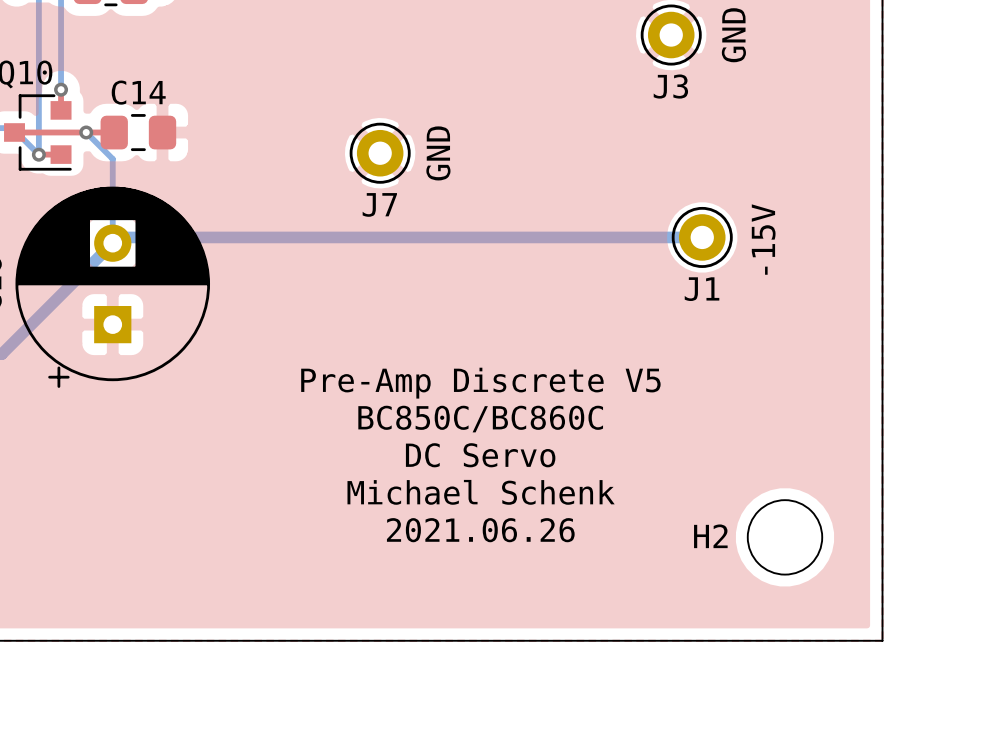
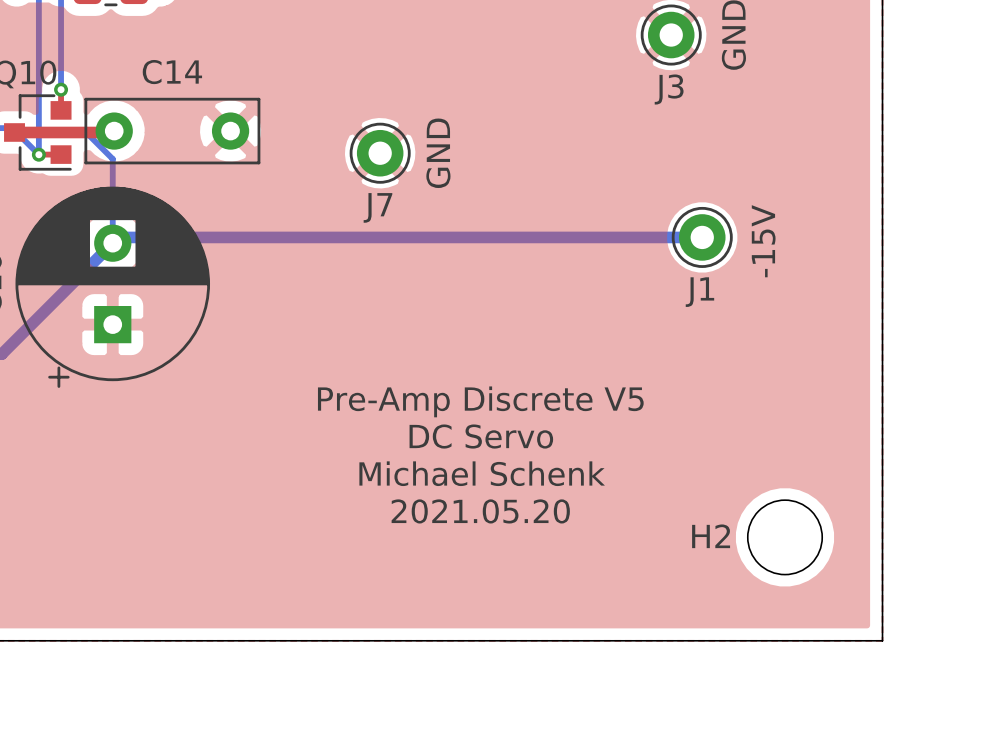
C14 footprint: [100, 114, 177, 152] -> [84, 97, 261, 165]
top track width: thin (14, 132) (112, 132) -> thick (14, 132) (112, 132)
via: (86, 132) -> none
text position: Pre-Amp Discrete V5 (480, 383) -> Pre-Amp Discrete V5 (480, 401)
text: BC850C/BC860C (480, 419) -> none
text position: DC Servo (480, 455) -> DC Servo (481, 436)
text position: Michael Schenk (481, 492) -> Michael Schenk (482, 473)
text: 2021.06.26 (480, 530) -> 2021.05.20 (480, 511)

